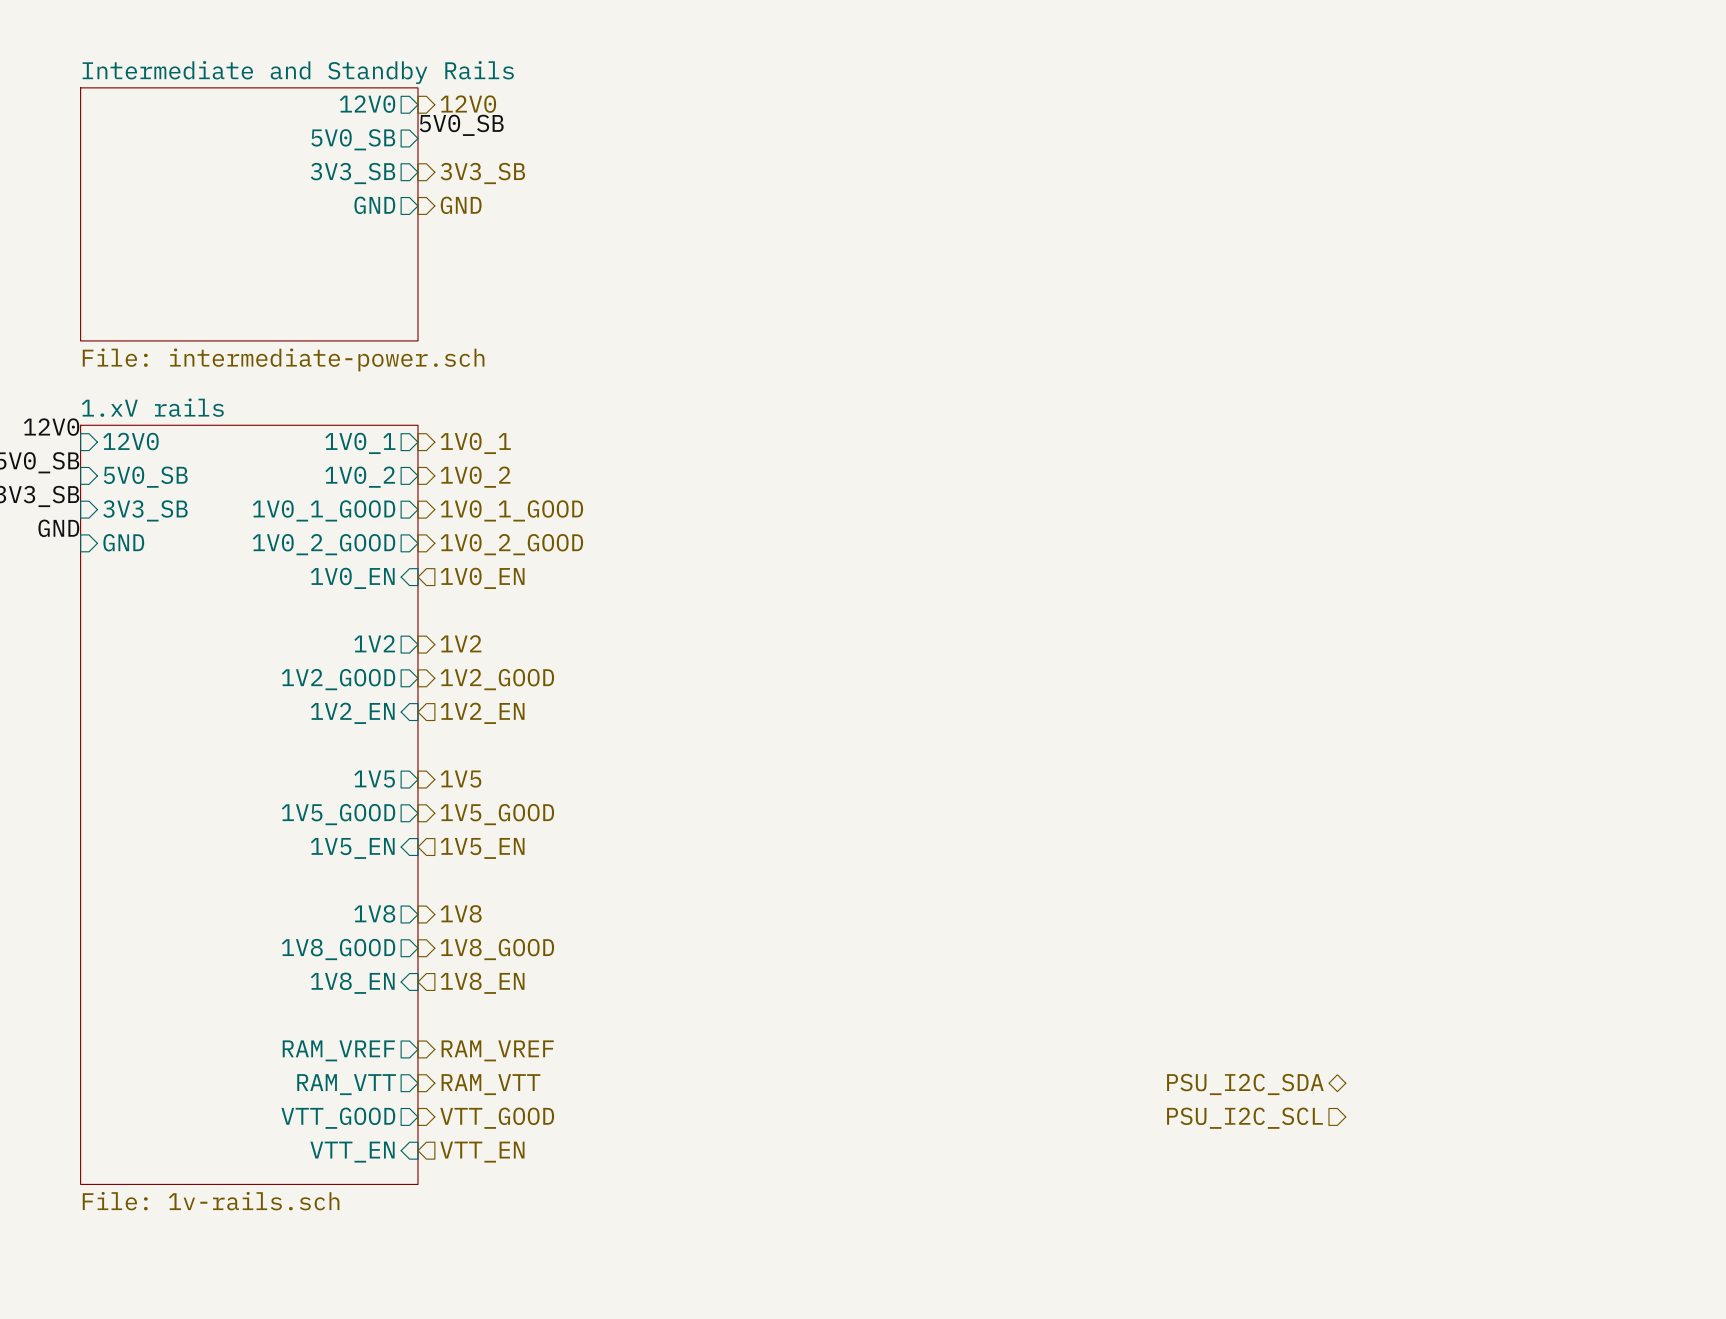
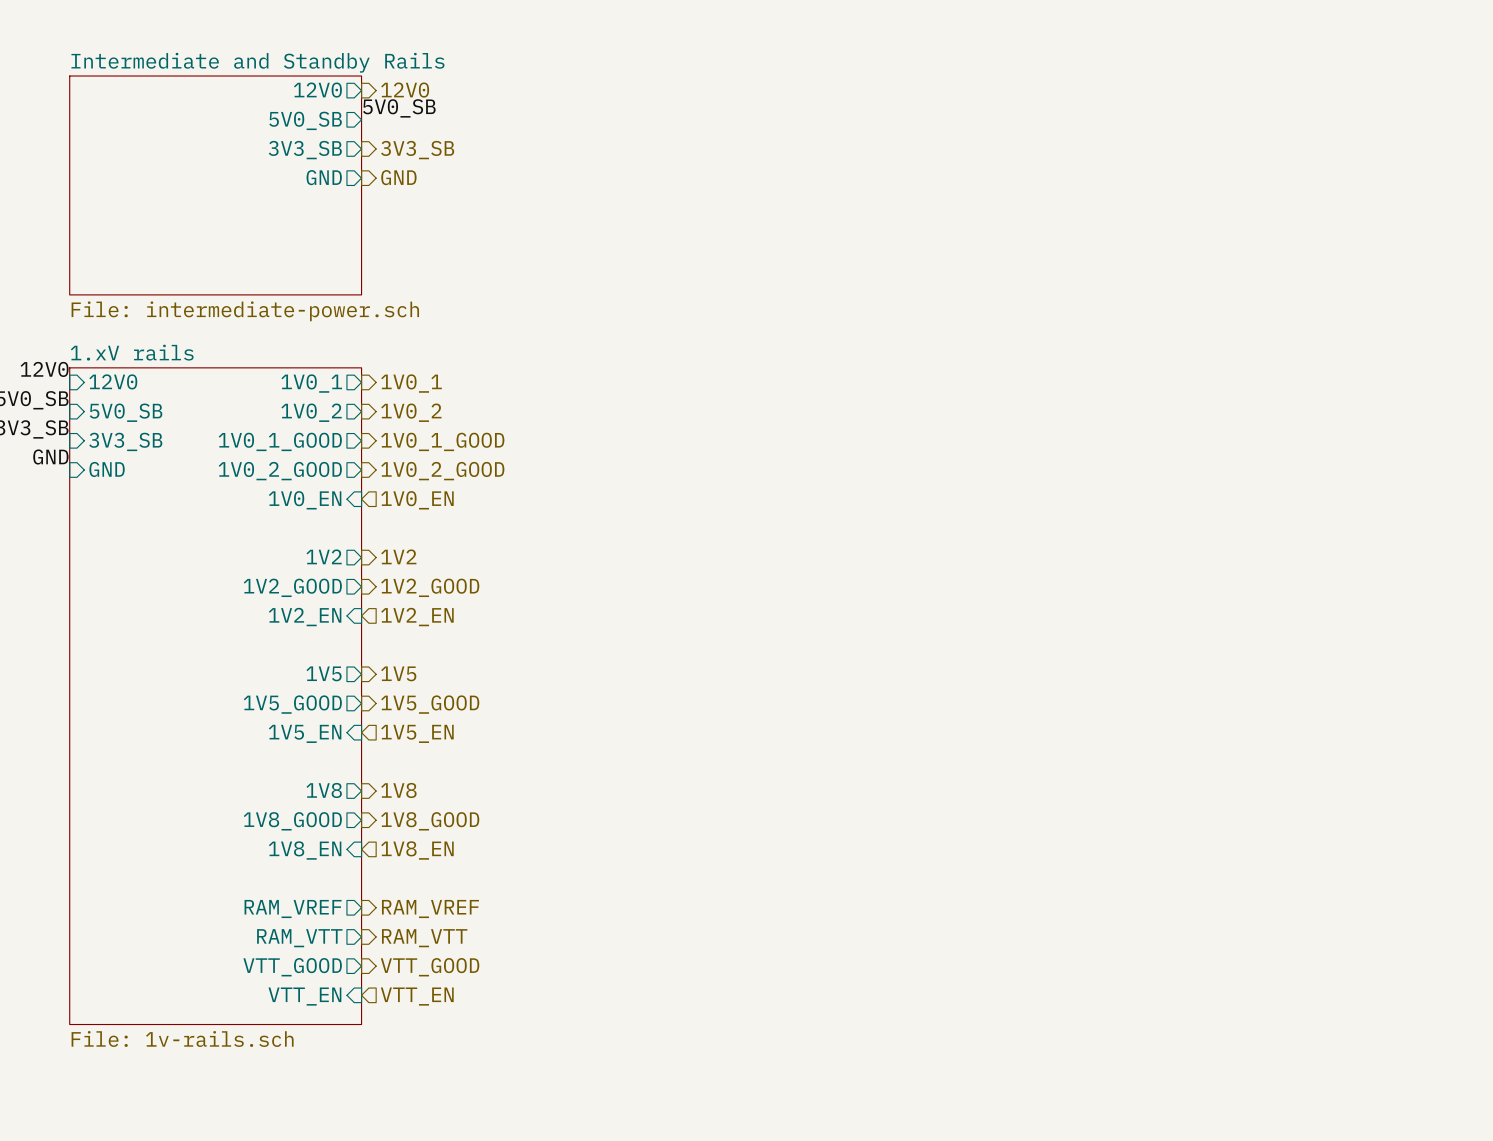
hierarchical label: PSU_I2C_SDA (1245, 1084) -> none
hierarchical label: PSU_I2C_SCL (1244, 1118) -> none

